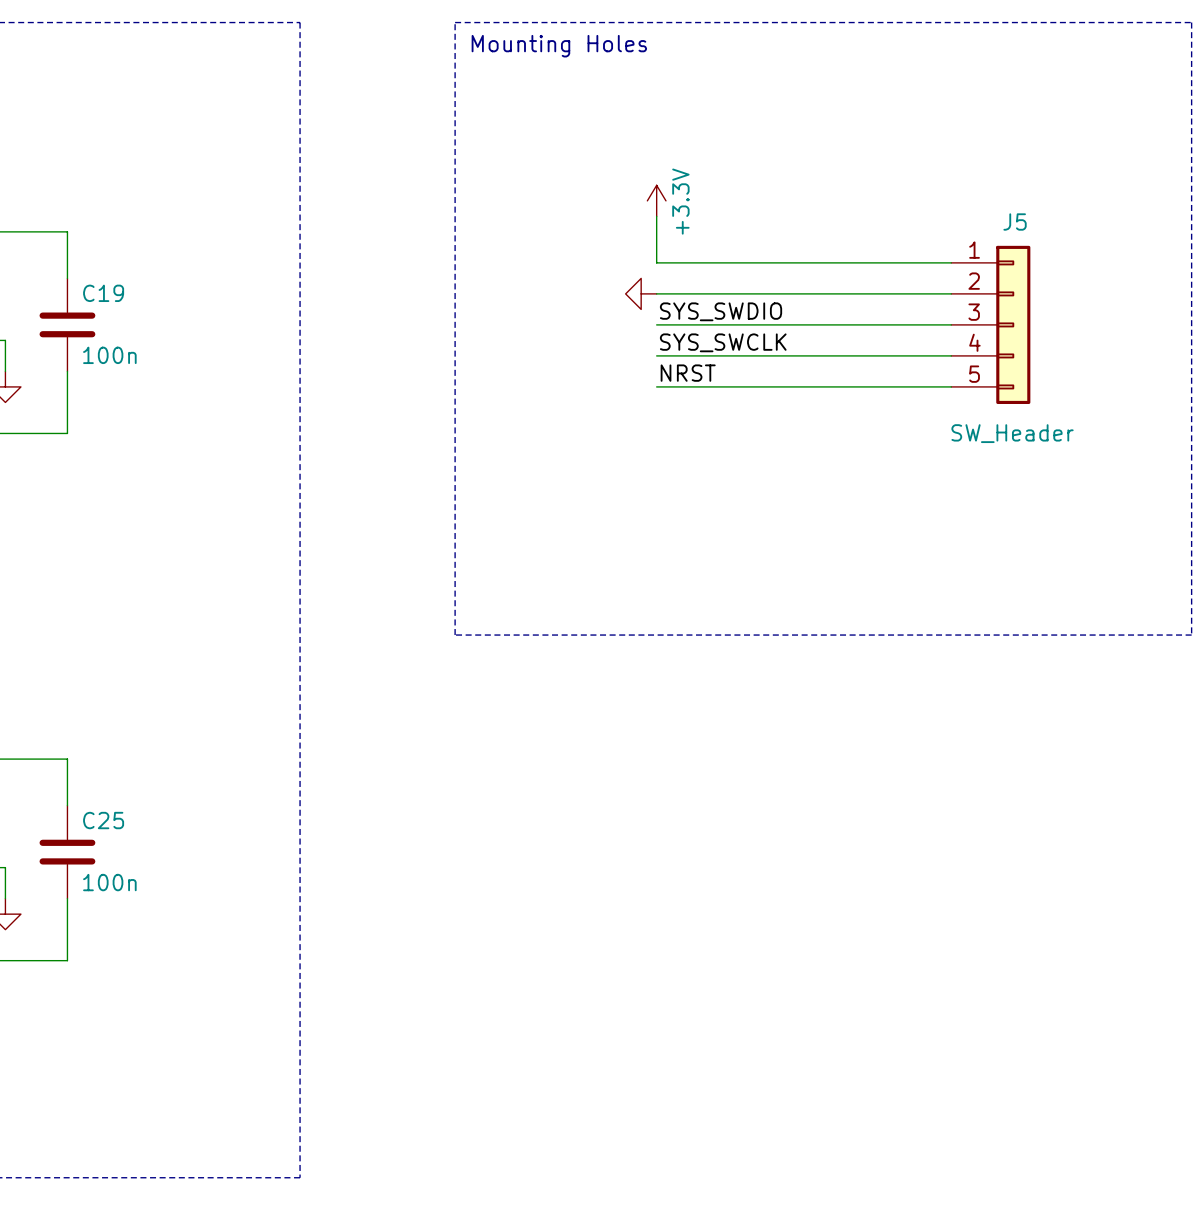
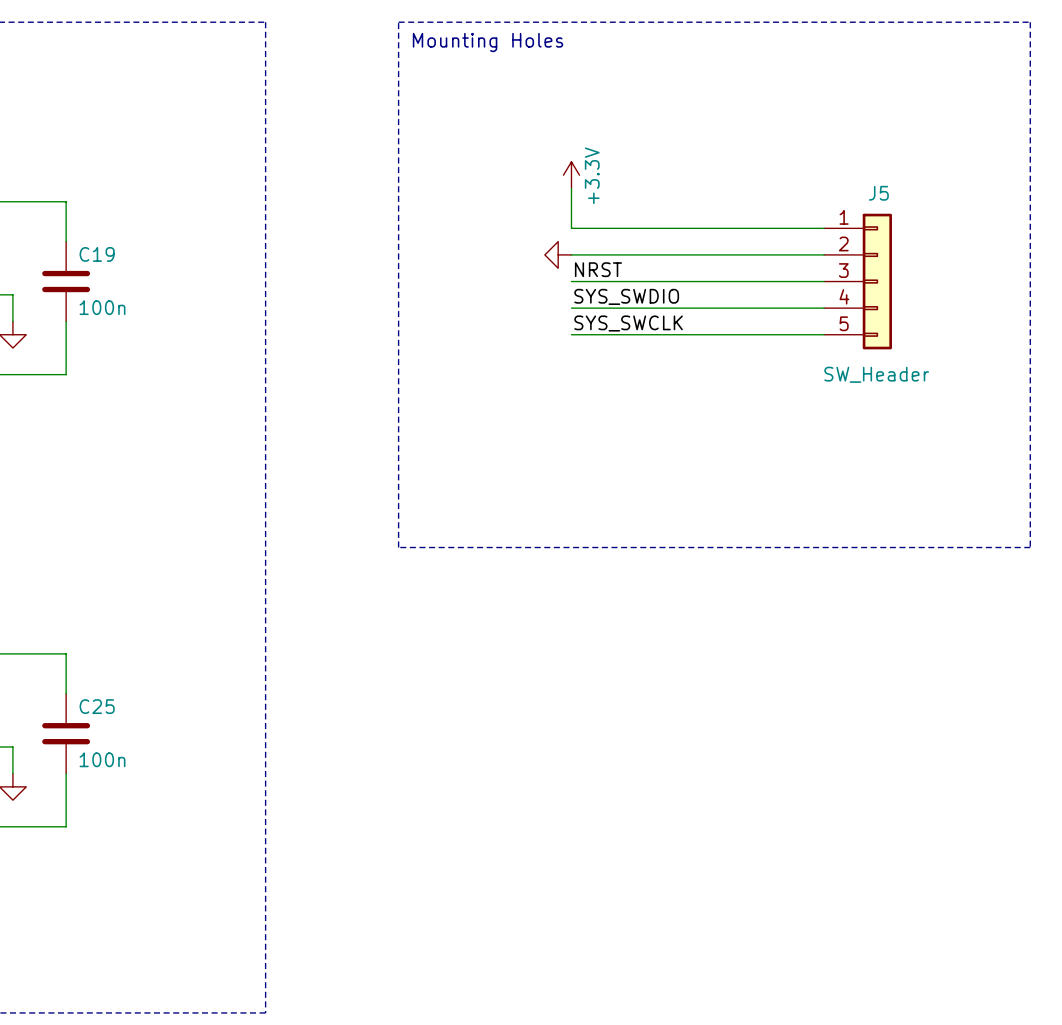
label: SYS_SWDIO (721, 311) -> NRST (598, 269)
label: SYS_SWCLK (723, 342) -> SYS_SWDIO (626, 296)
label: NRST (688, 373) -> SYS_SWCLK (628, 323)

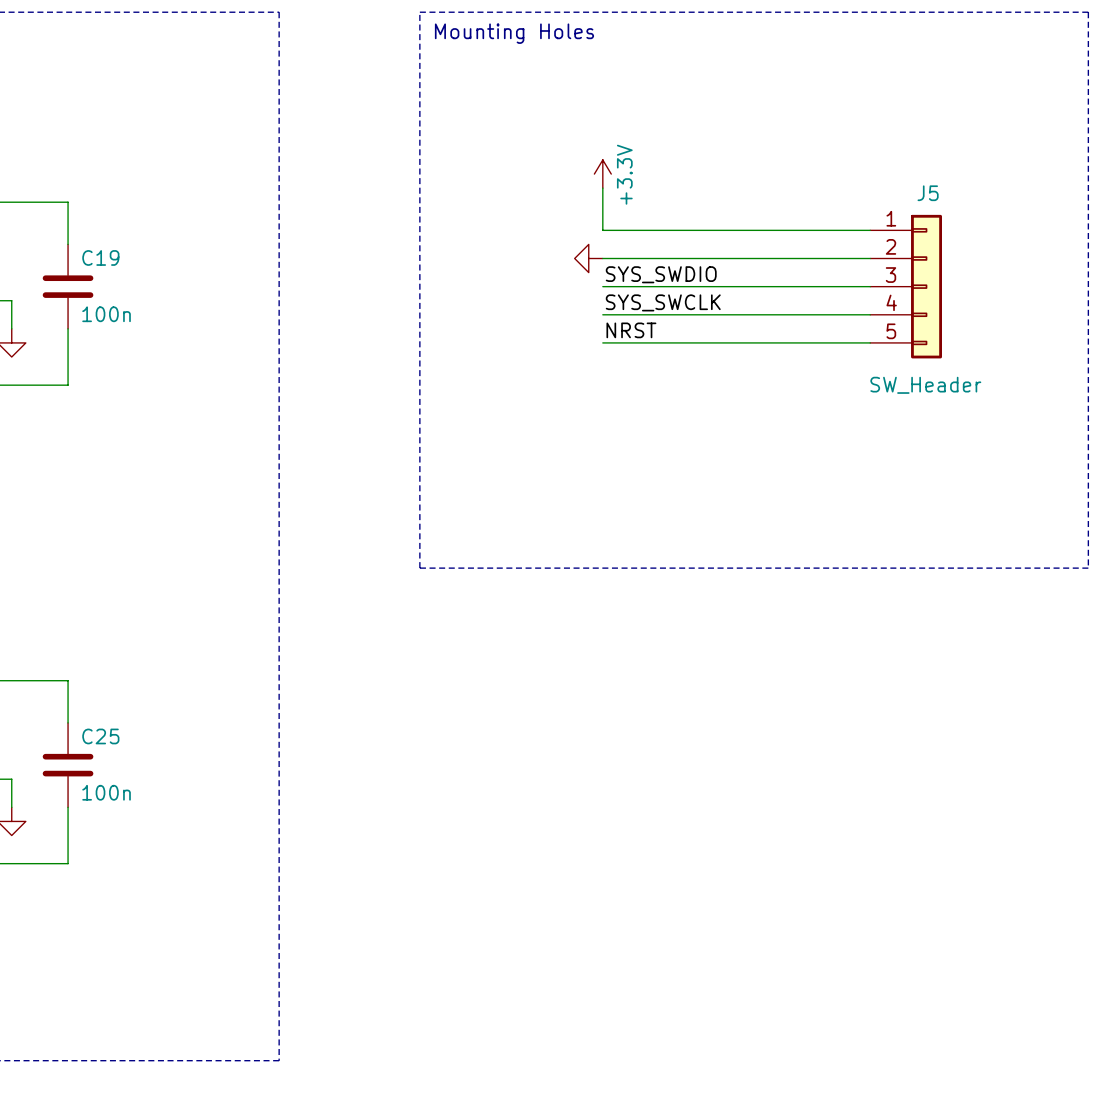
label: NRST (598, 269) -> SYS_SWDIO (661, 274)
label: SYS_SWDIO (626, 296) -> SYS_SWCLK (663, 302)
label: SYS_SWCLK (628, 323) -> NRST (631, 330)

